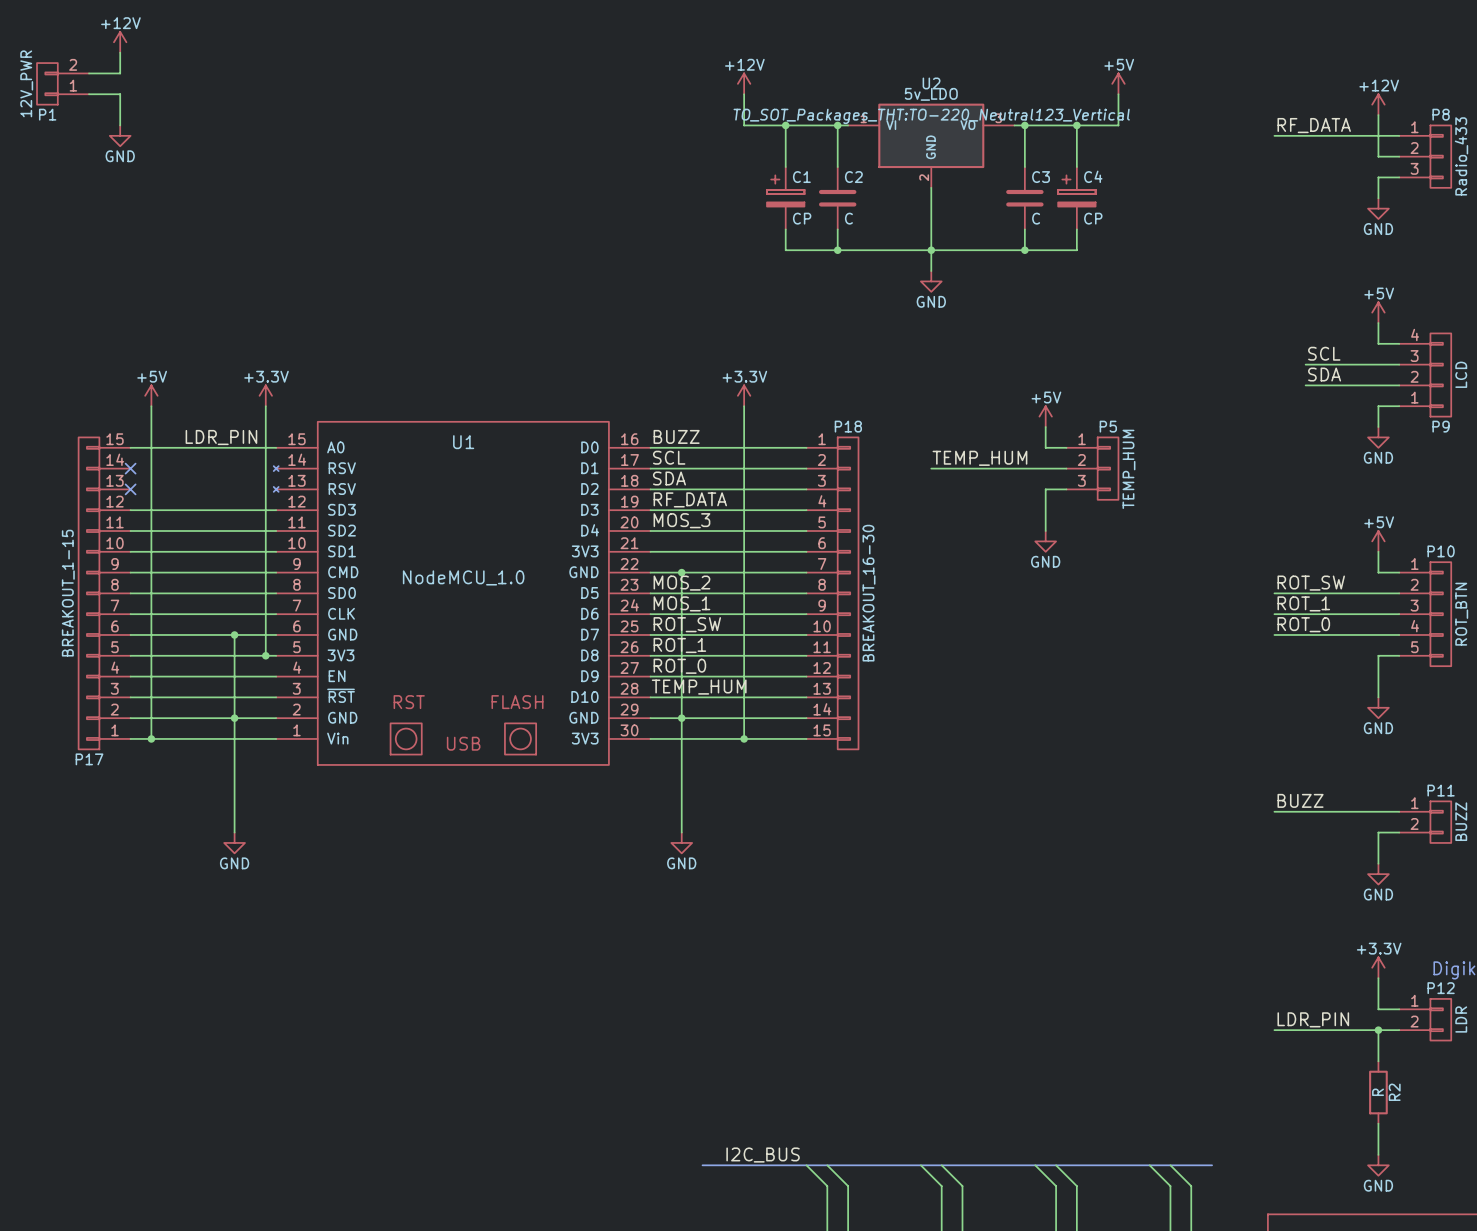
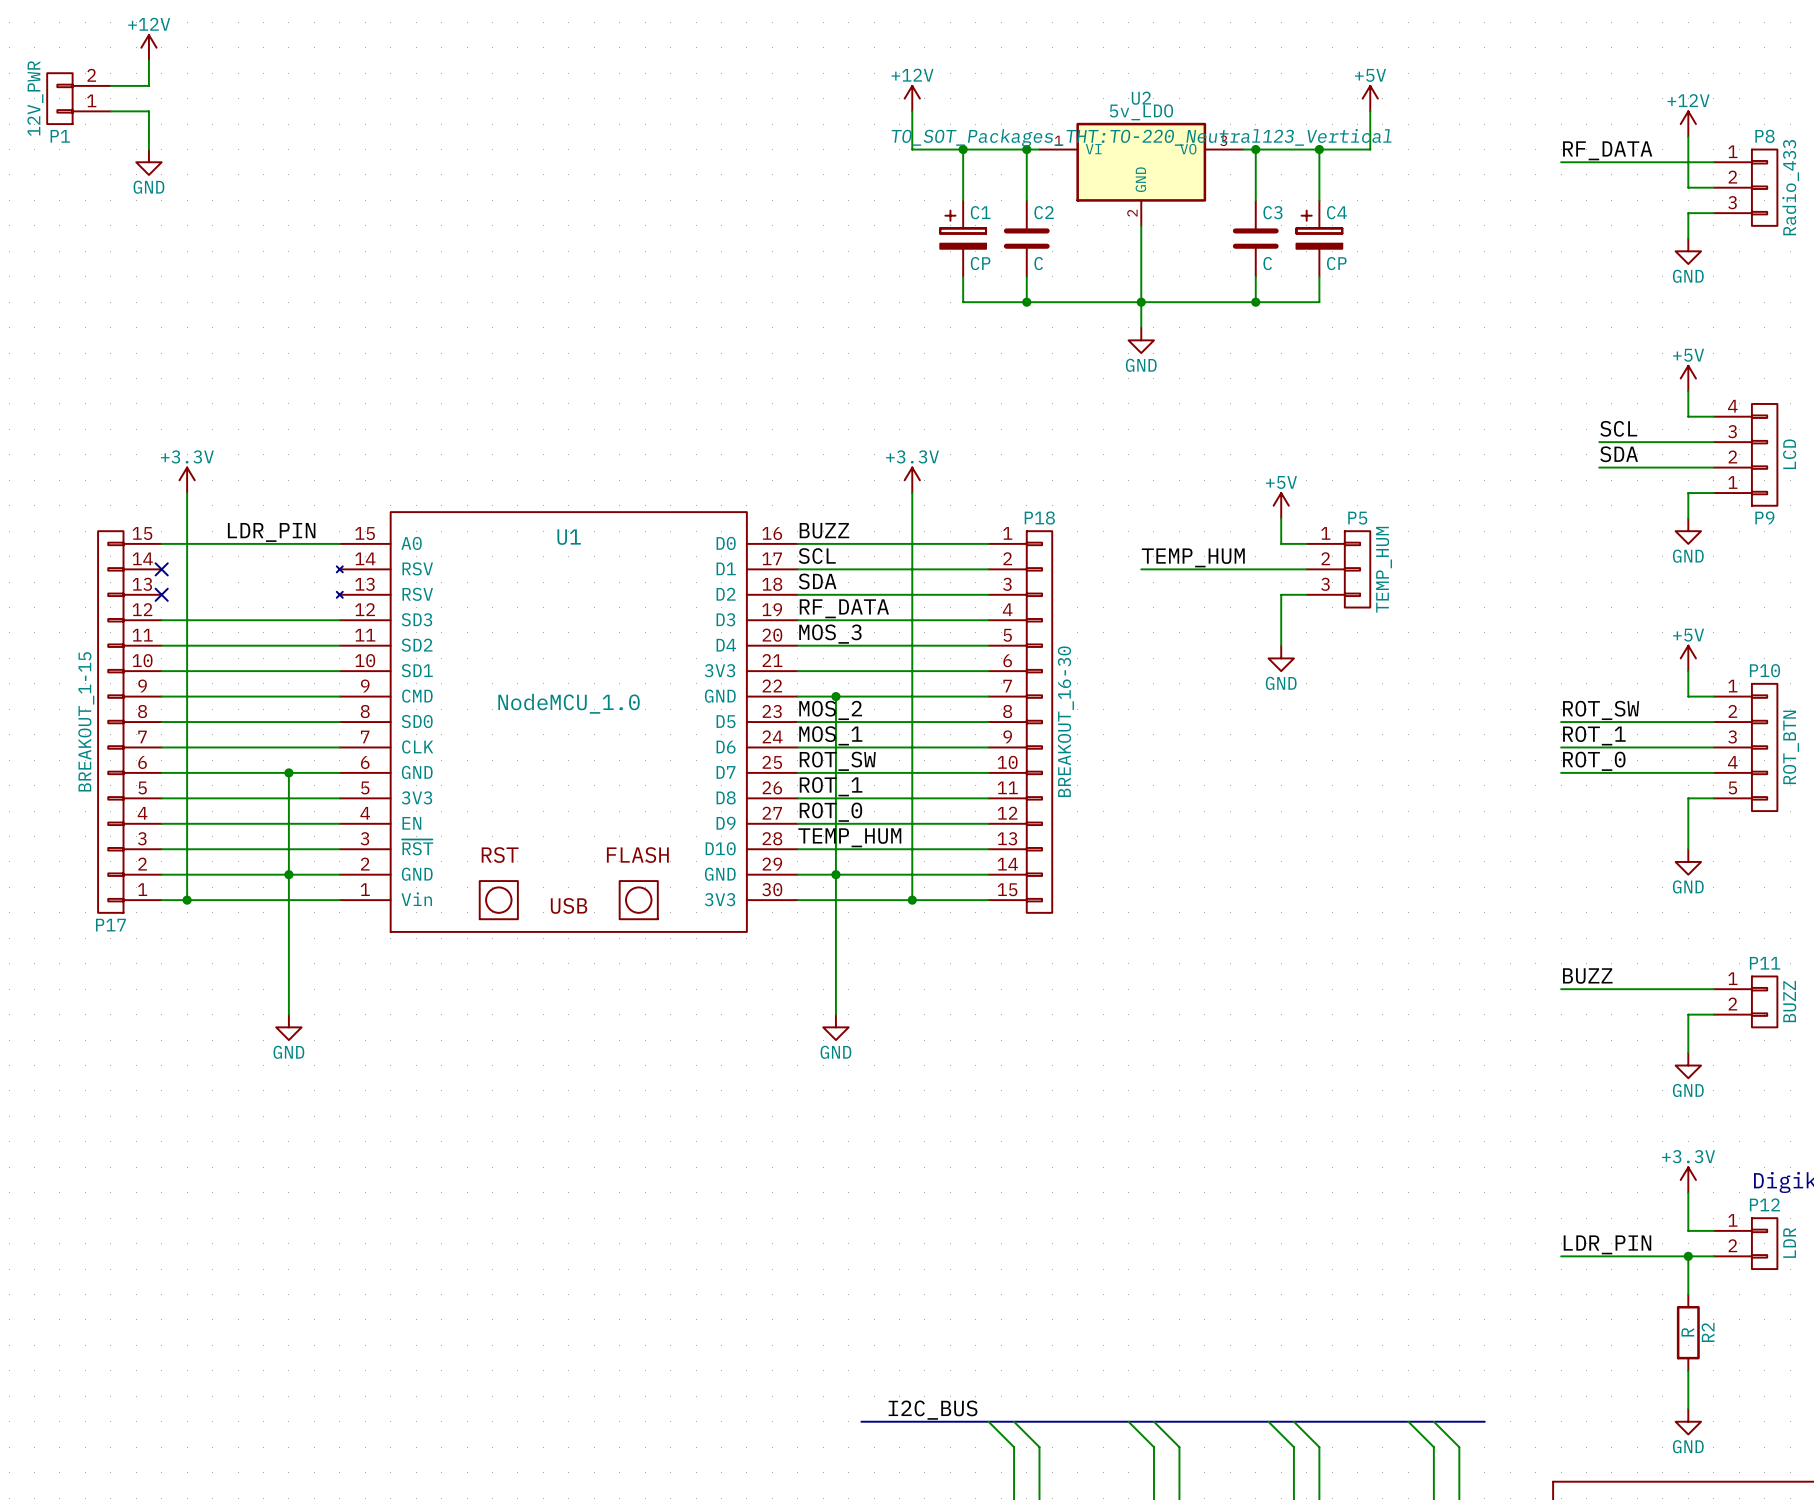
power symbol: +5V (151, 395) -> +3.3V (187, 480)
power symbol: +3.3V (265, 395) -> none
wire: (265, 406) (265, 655) -> none
junction: (265, 655) -> none

